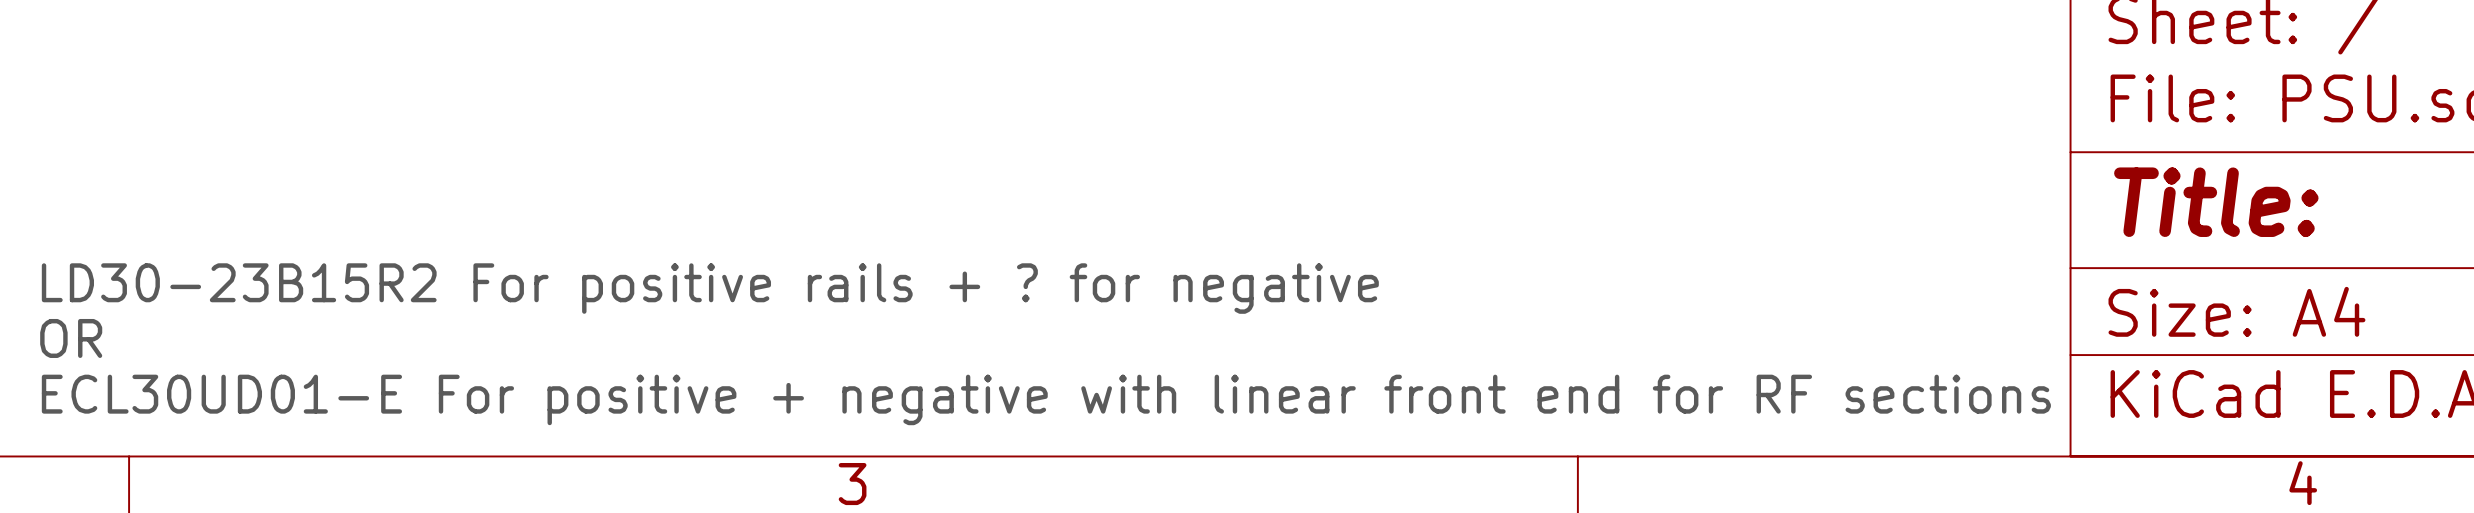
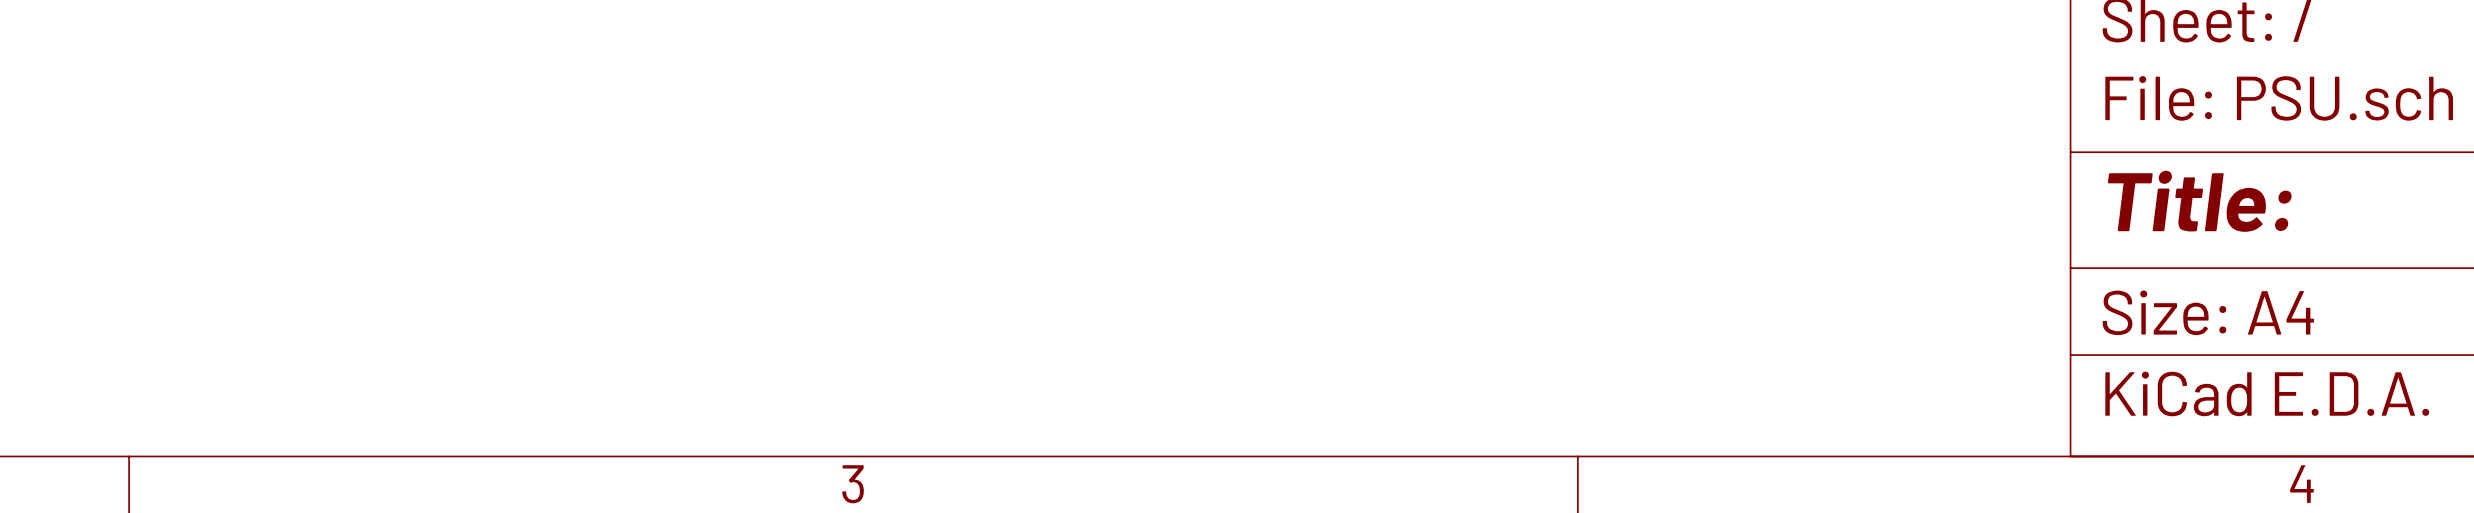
text: LD30-23B15R2 For positive rails + ? for negative (710, 288) -> none
text: OR (71, 338) -> none
text: ECL30UD01-E For positive + negative with linear front end for RF sections (1046, 399) -> none

